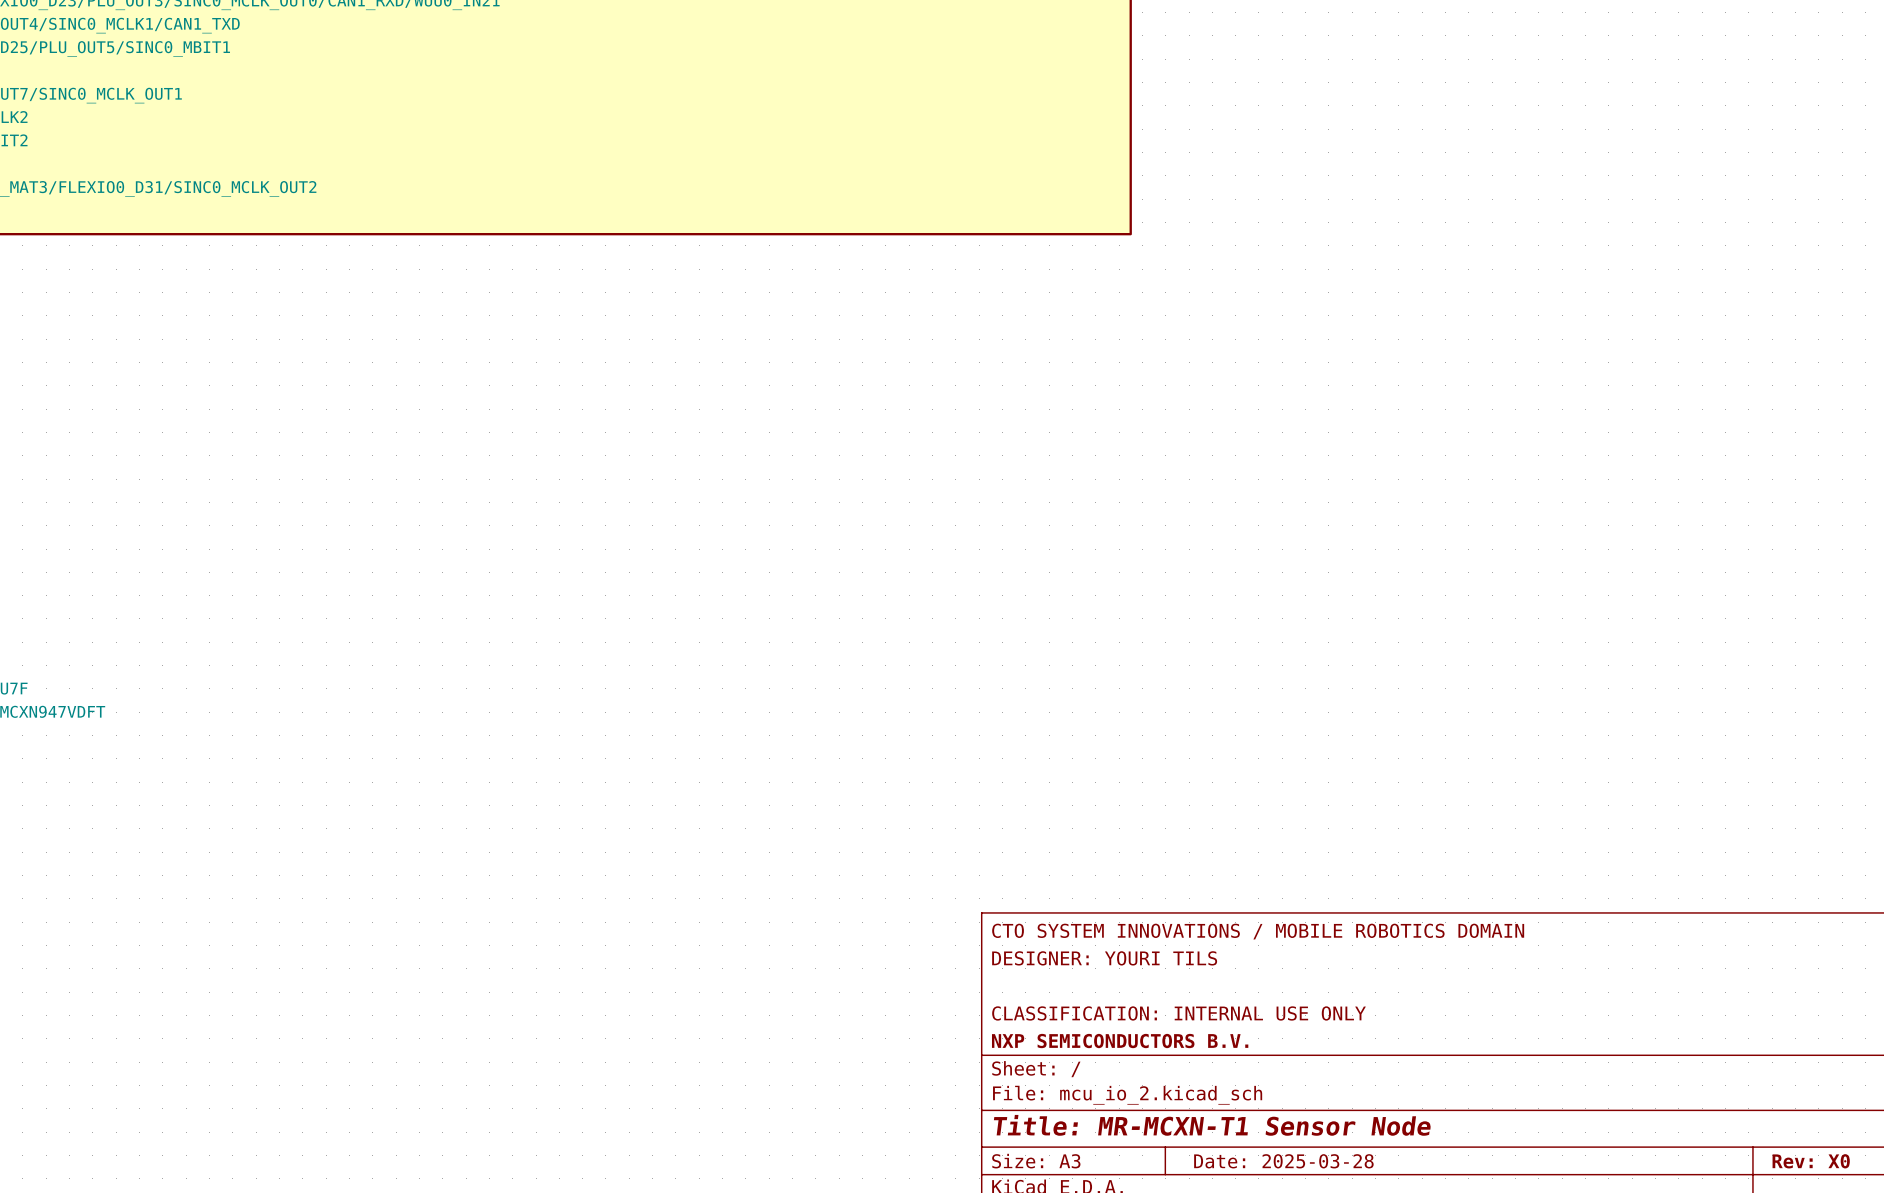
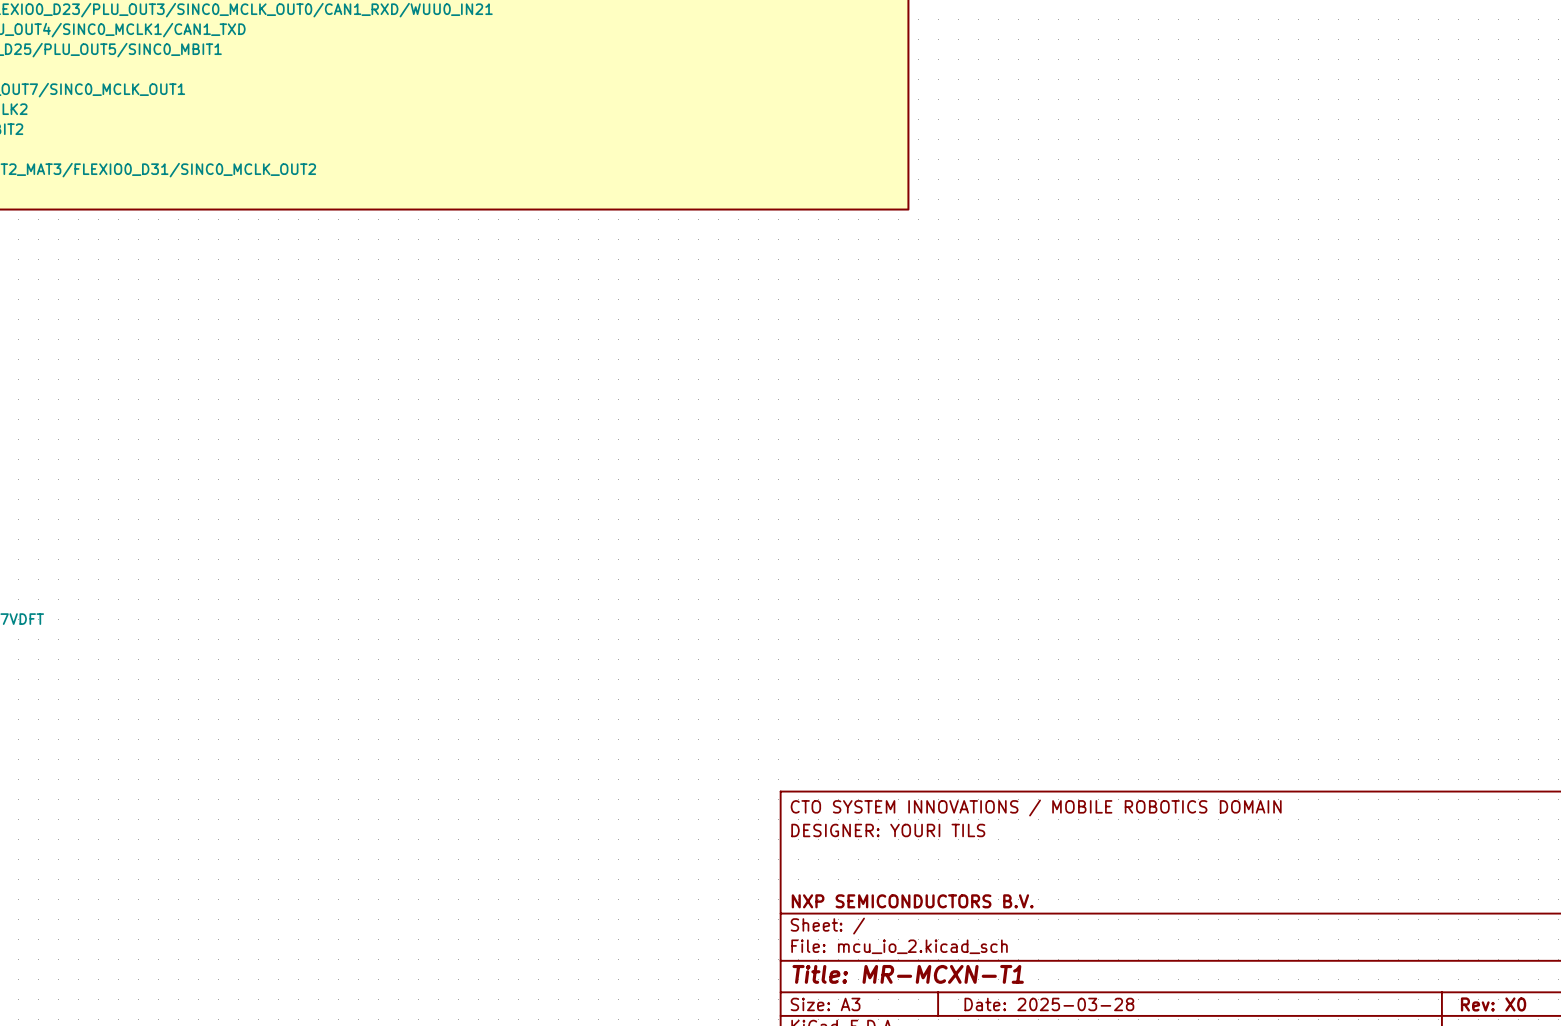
title block: CLASSIFICATION: INTERNAL USE ONLY (1179, 1013) -> none
title block: Title: MR-MCXN-T1 Sensor Node (1212, 1125) -> Title: MR-MCXN-T1 (908, 974)

